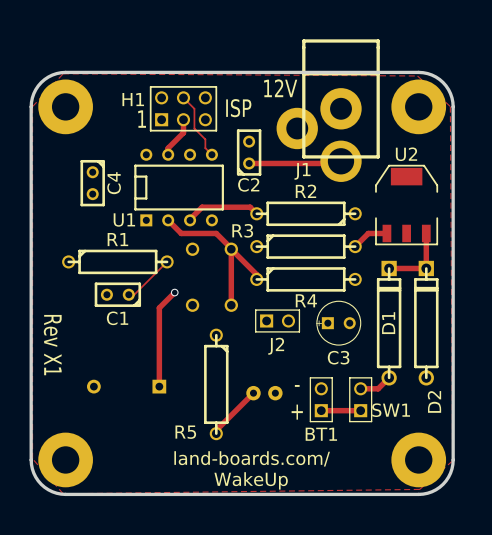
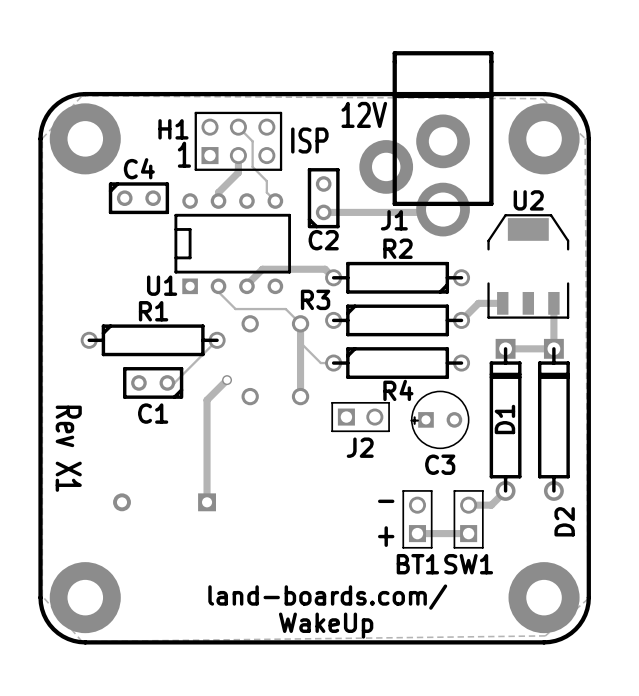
C4 rotation: 0° (92, 183) -> 90° counterclockwise (138, 198)
C4 position: (92, 183) -> (138, 198)
track: (168, 220) (181, 233) (216, 233) (256, 274) (256, 279) -> (218, 286) (218, 291) (235, 309) (285, 309) (300, 323)
track: none -> (300, 342) (320, 363) (333, 363)
R5: (216, 384) -> none
track: (253, 393) (216, 430) (216, 433) -> none
part: (264, 393) -> none
SW1 name position: SW1 (391, 410) -> SW1 (468, 564)

